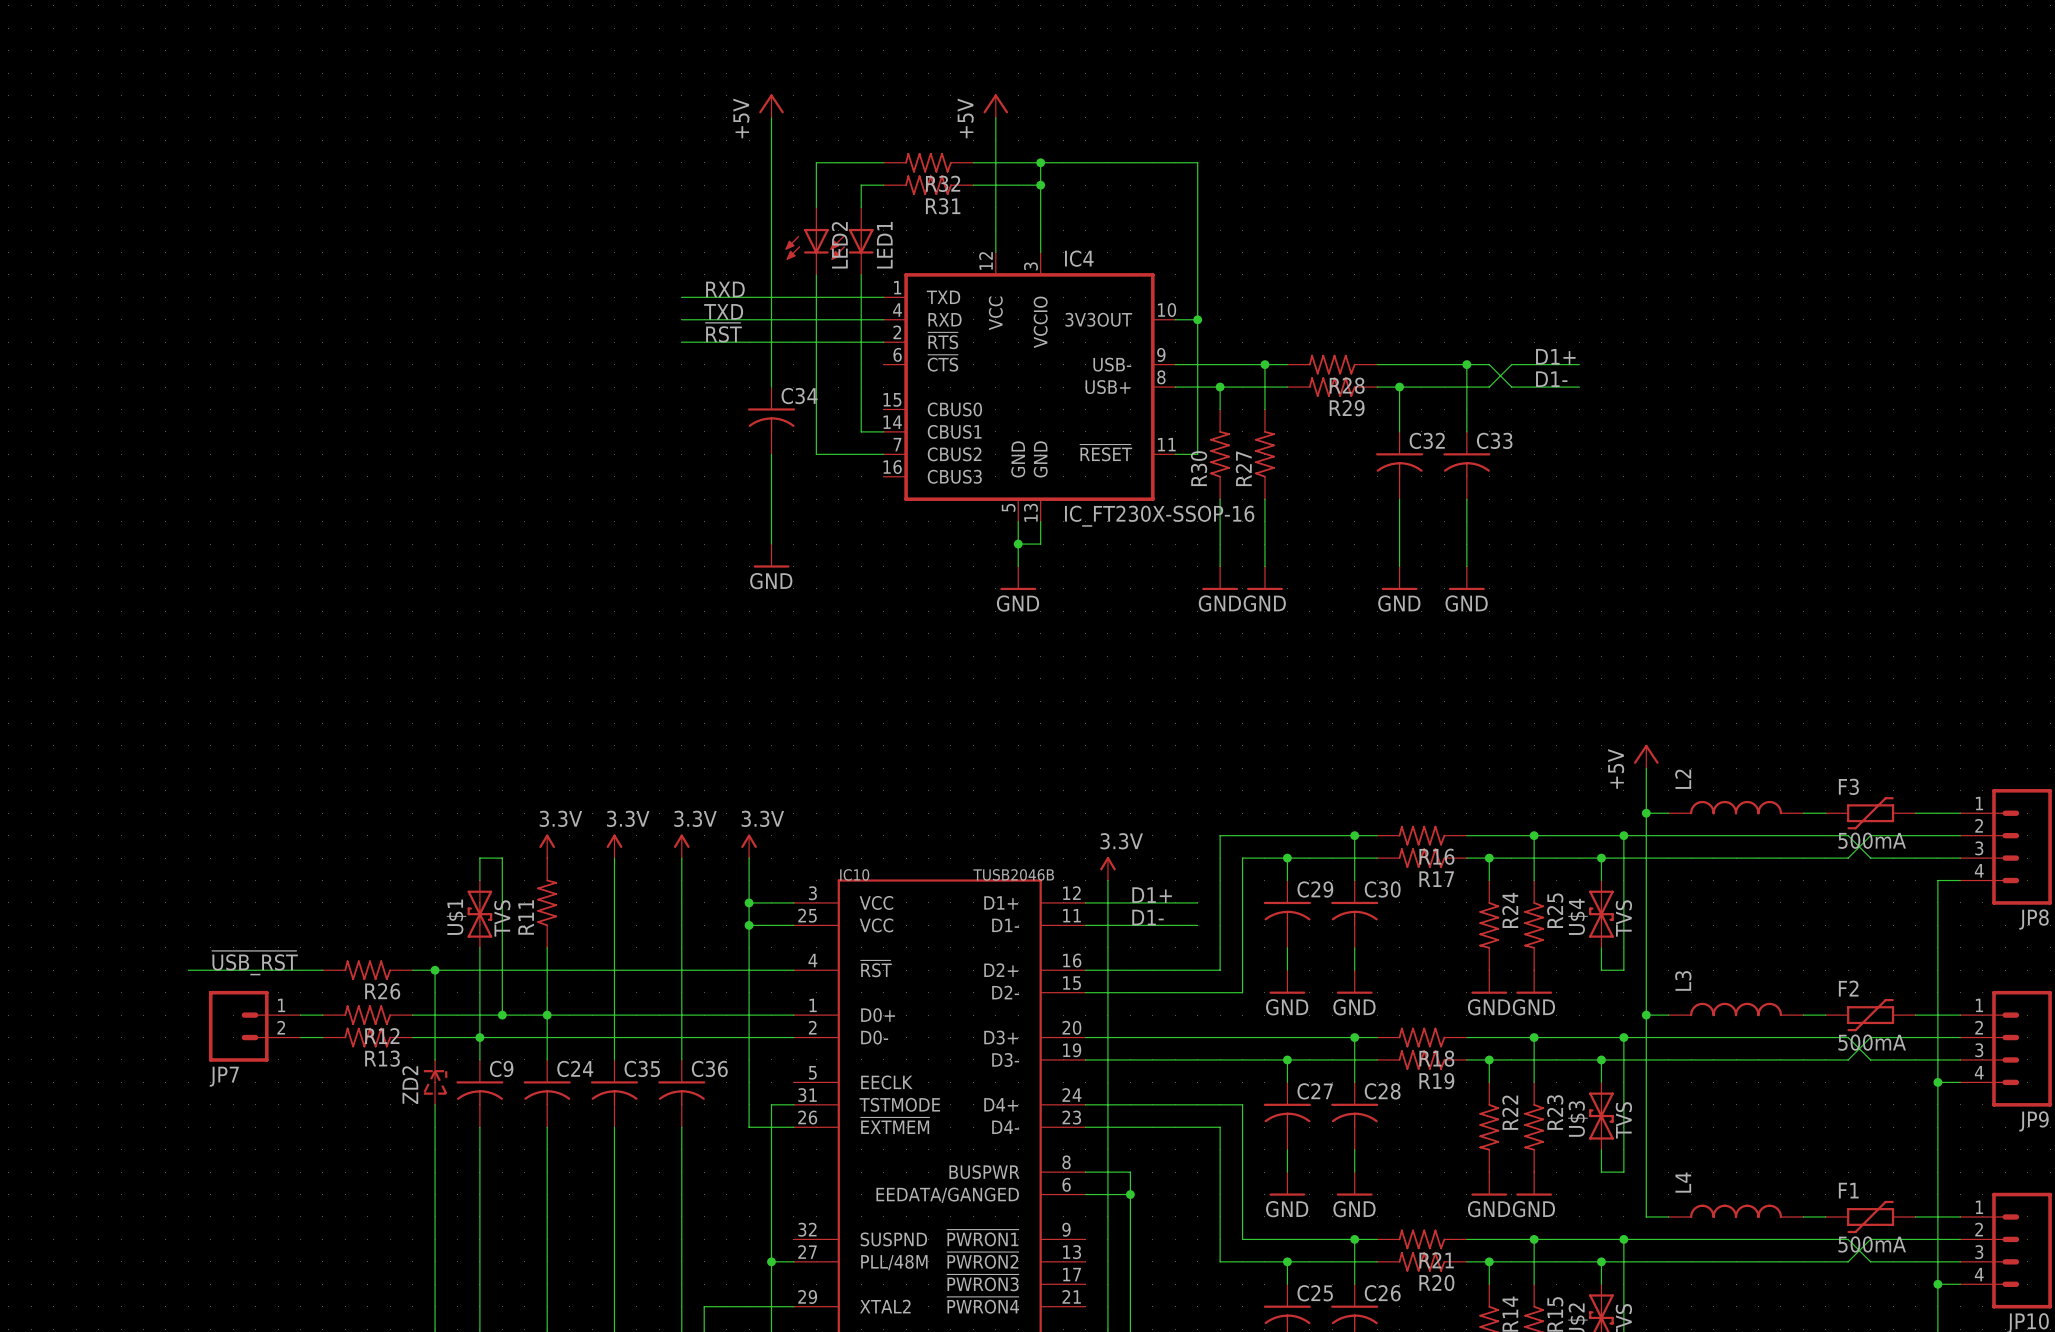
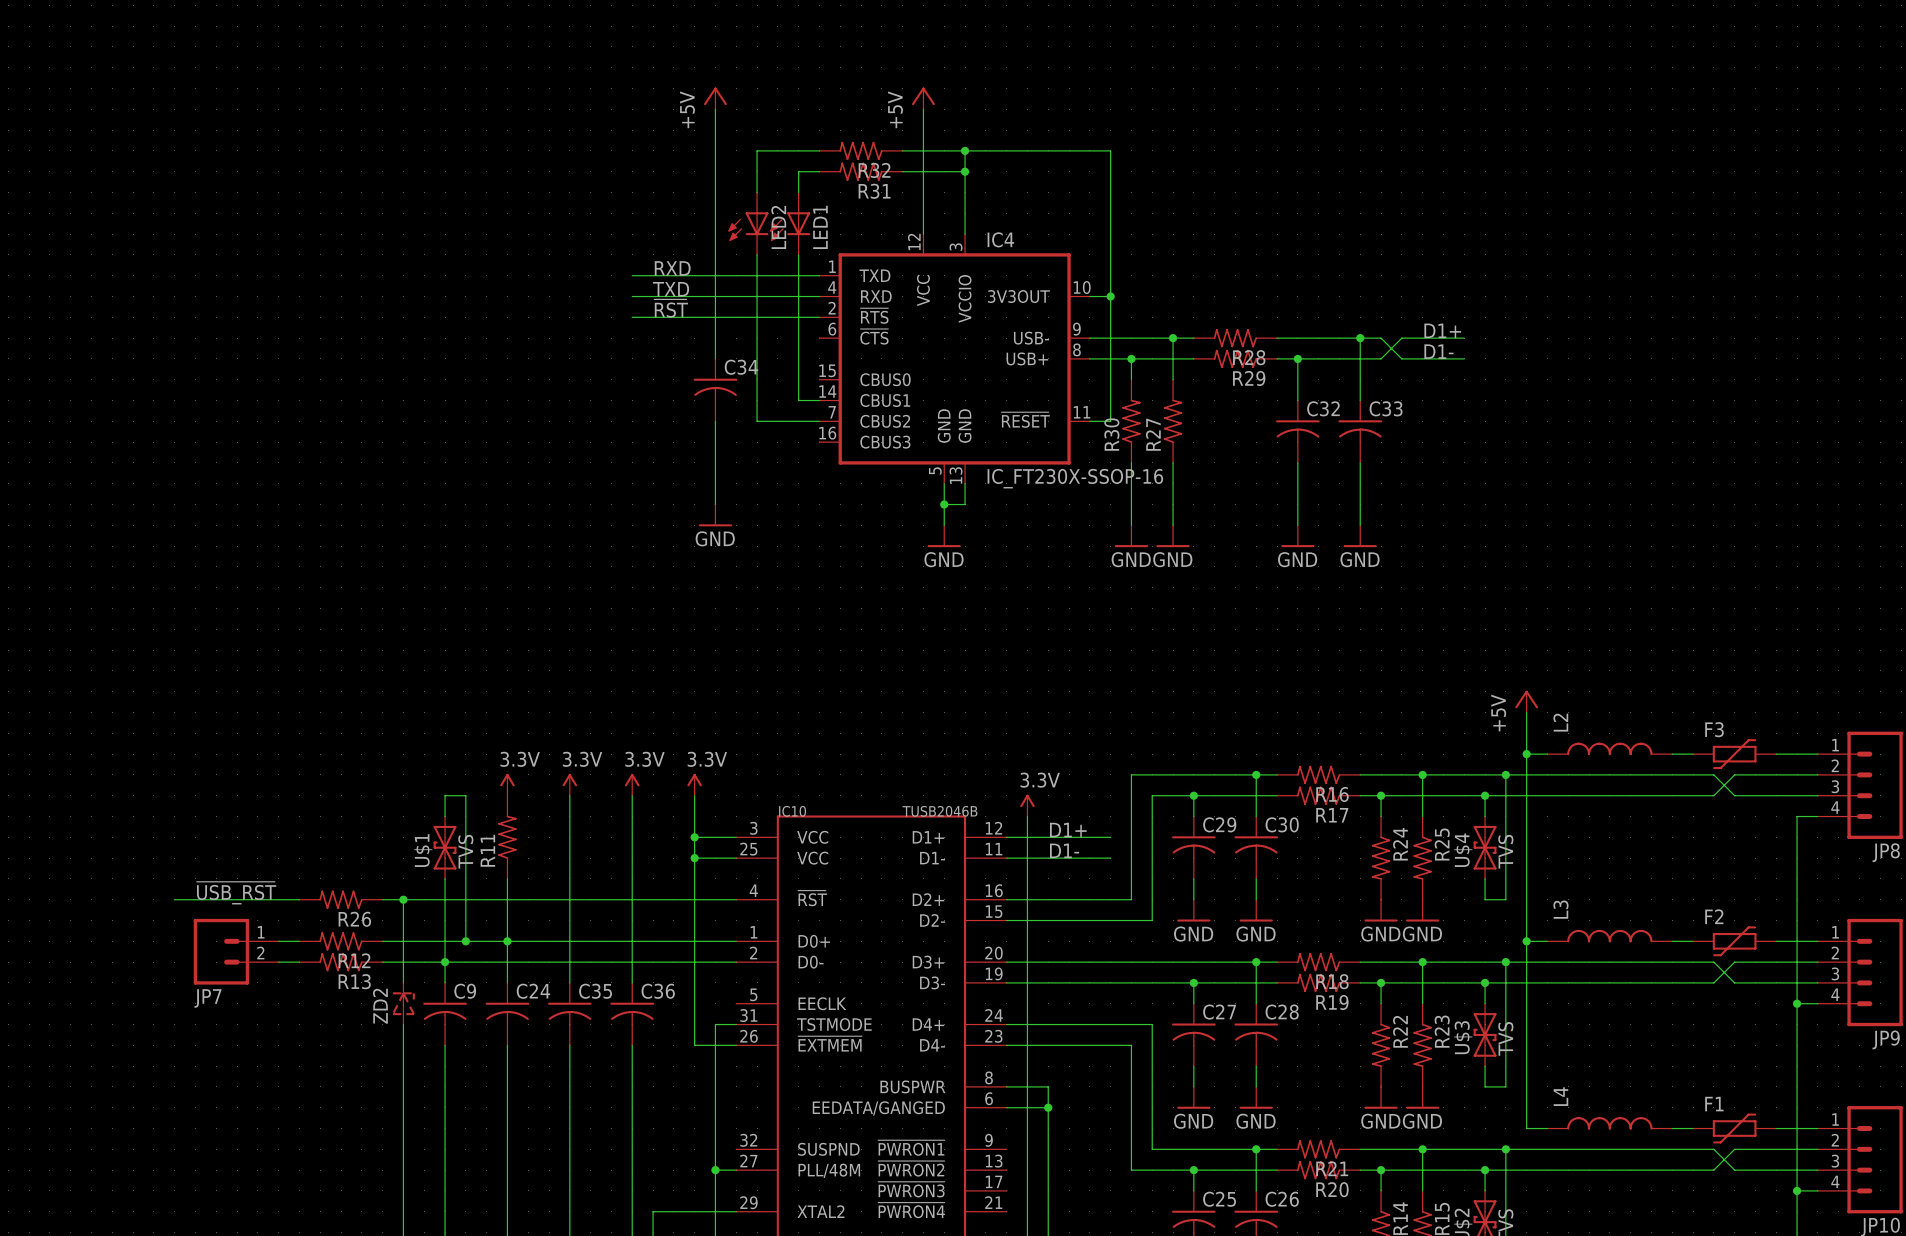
F3 value: 500mA (1872, 840) -> none
F2 value: 500mA (1872, 1042) -> none
F1 value: 500mA (1872, 1244) -> none

